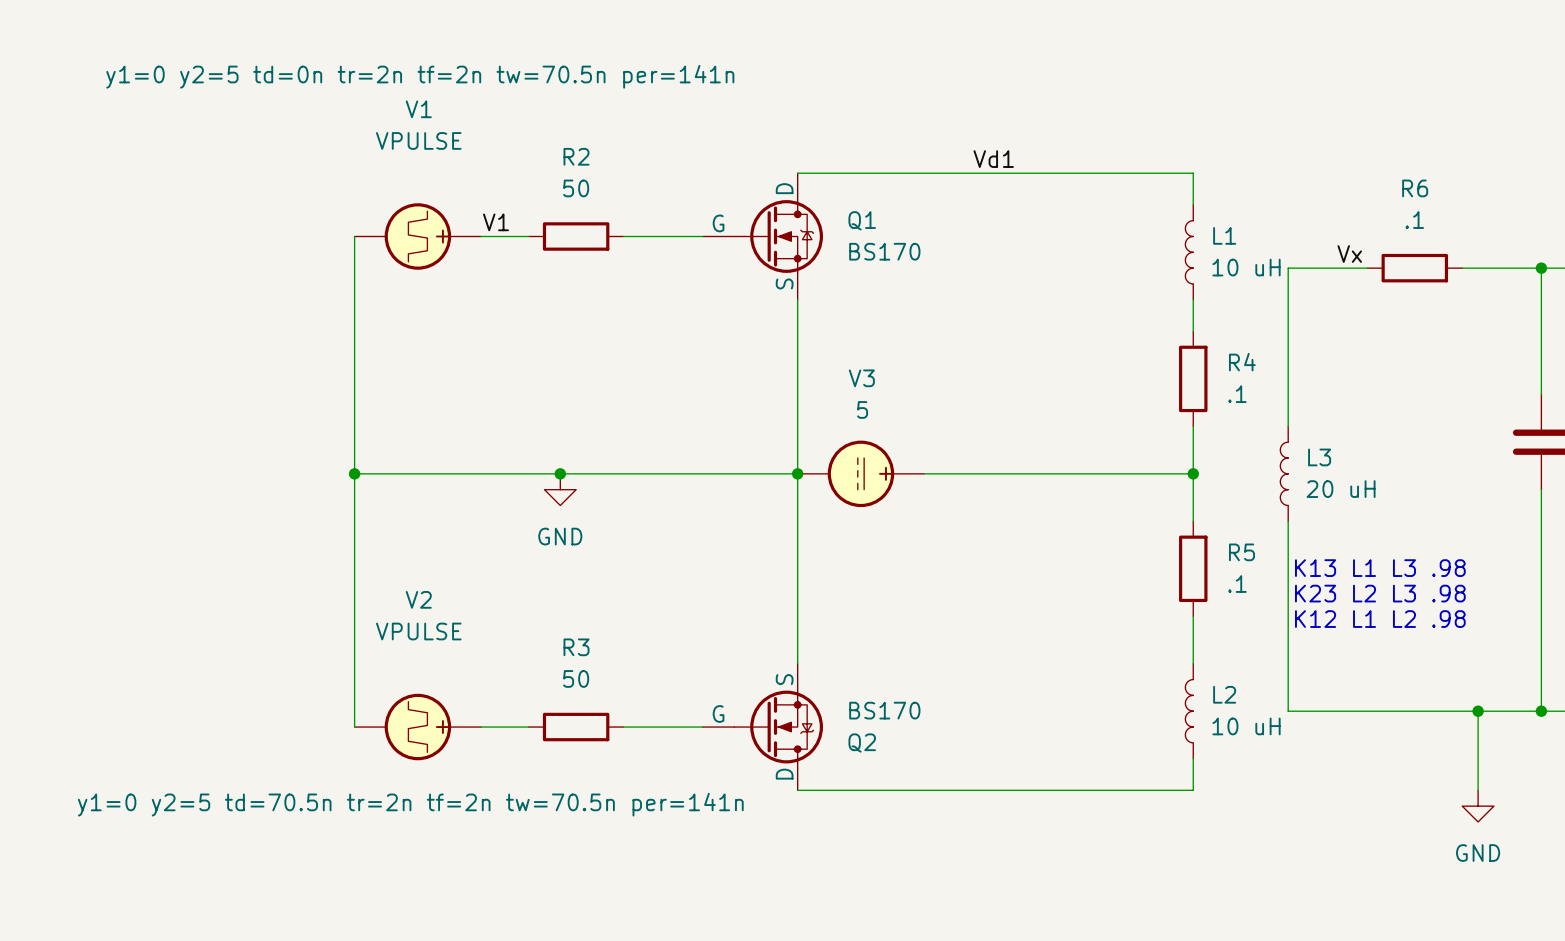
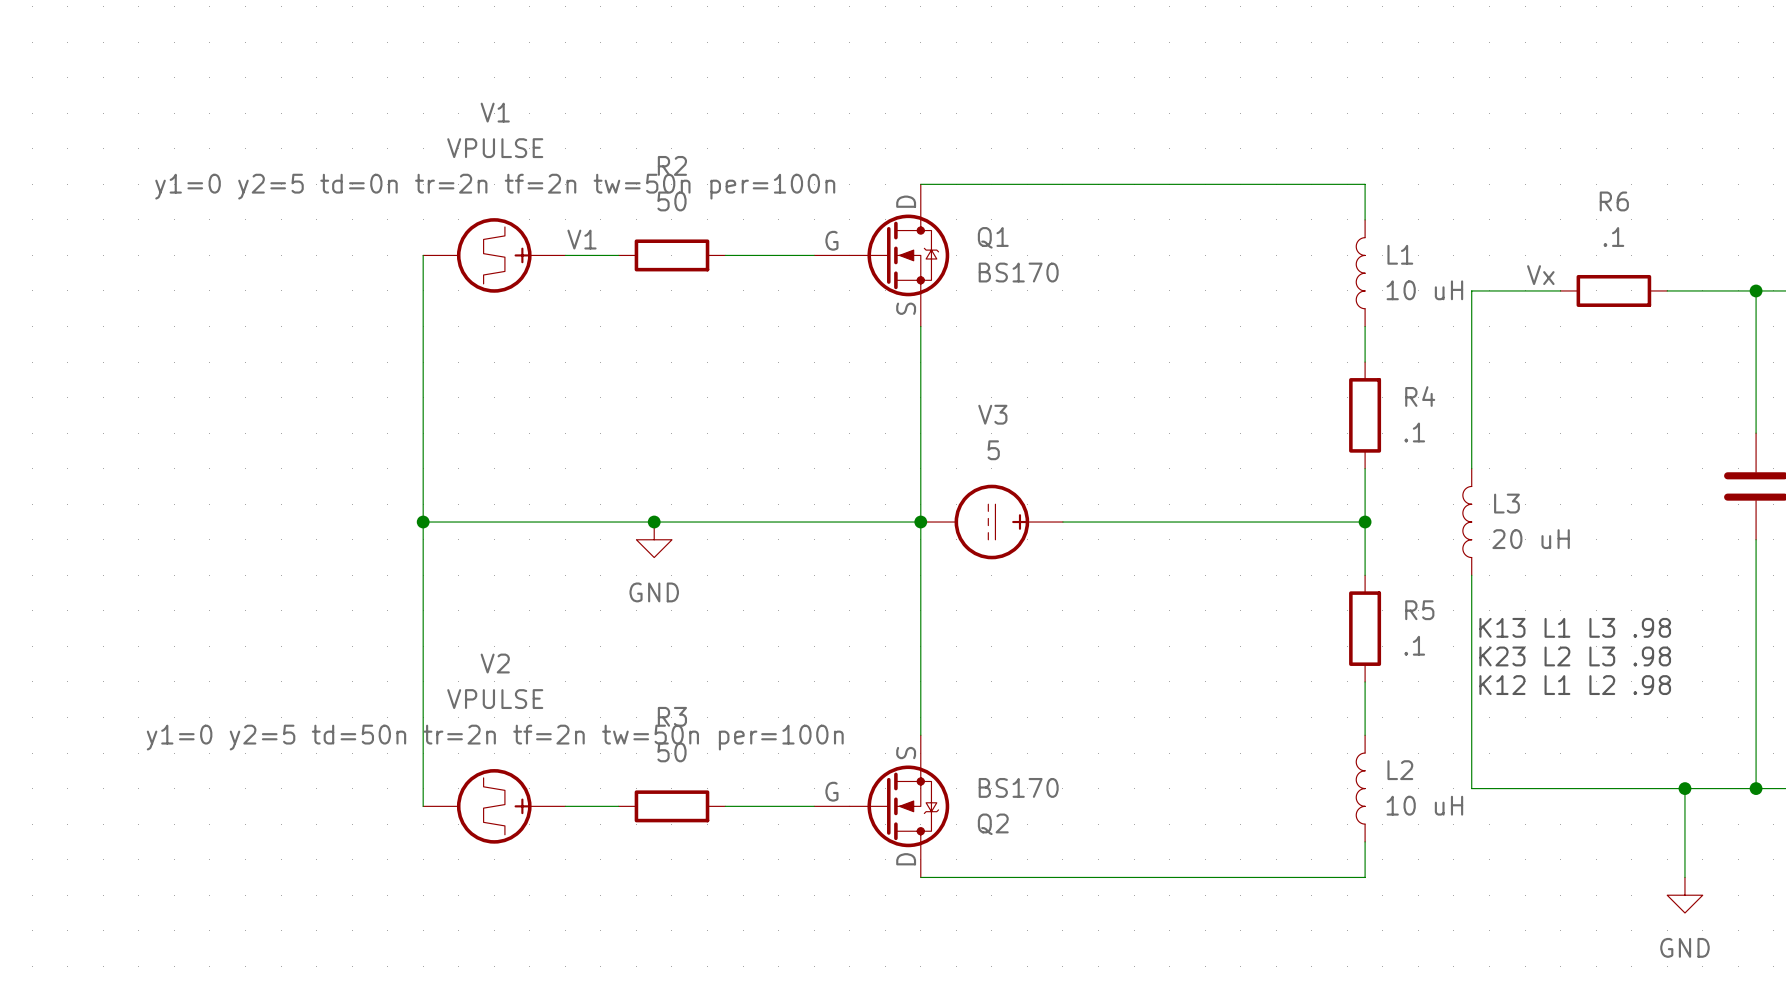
V1 text: y1=0 y2=5 td=0n tr=2n tf=2n tw=70.5n per=141n (420, 76) -> y1=0 y2=5 td=0n tr=2n tf=2n tw=50n per=100n (495, 186)
label: Vd1 (993, 159) -> none
V2 text: y1=0 y2=5 td=70.5n tr=2n tf=2n tw=70.5n per=141n (410, 804) -> y1=0 y2=5 td=50n tr=2n tf=2n tw=50n per=100n (495, 737)

